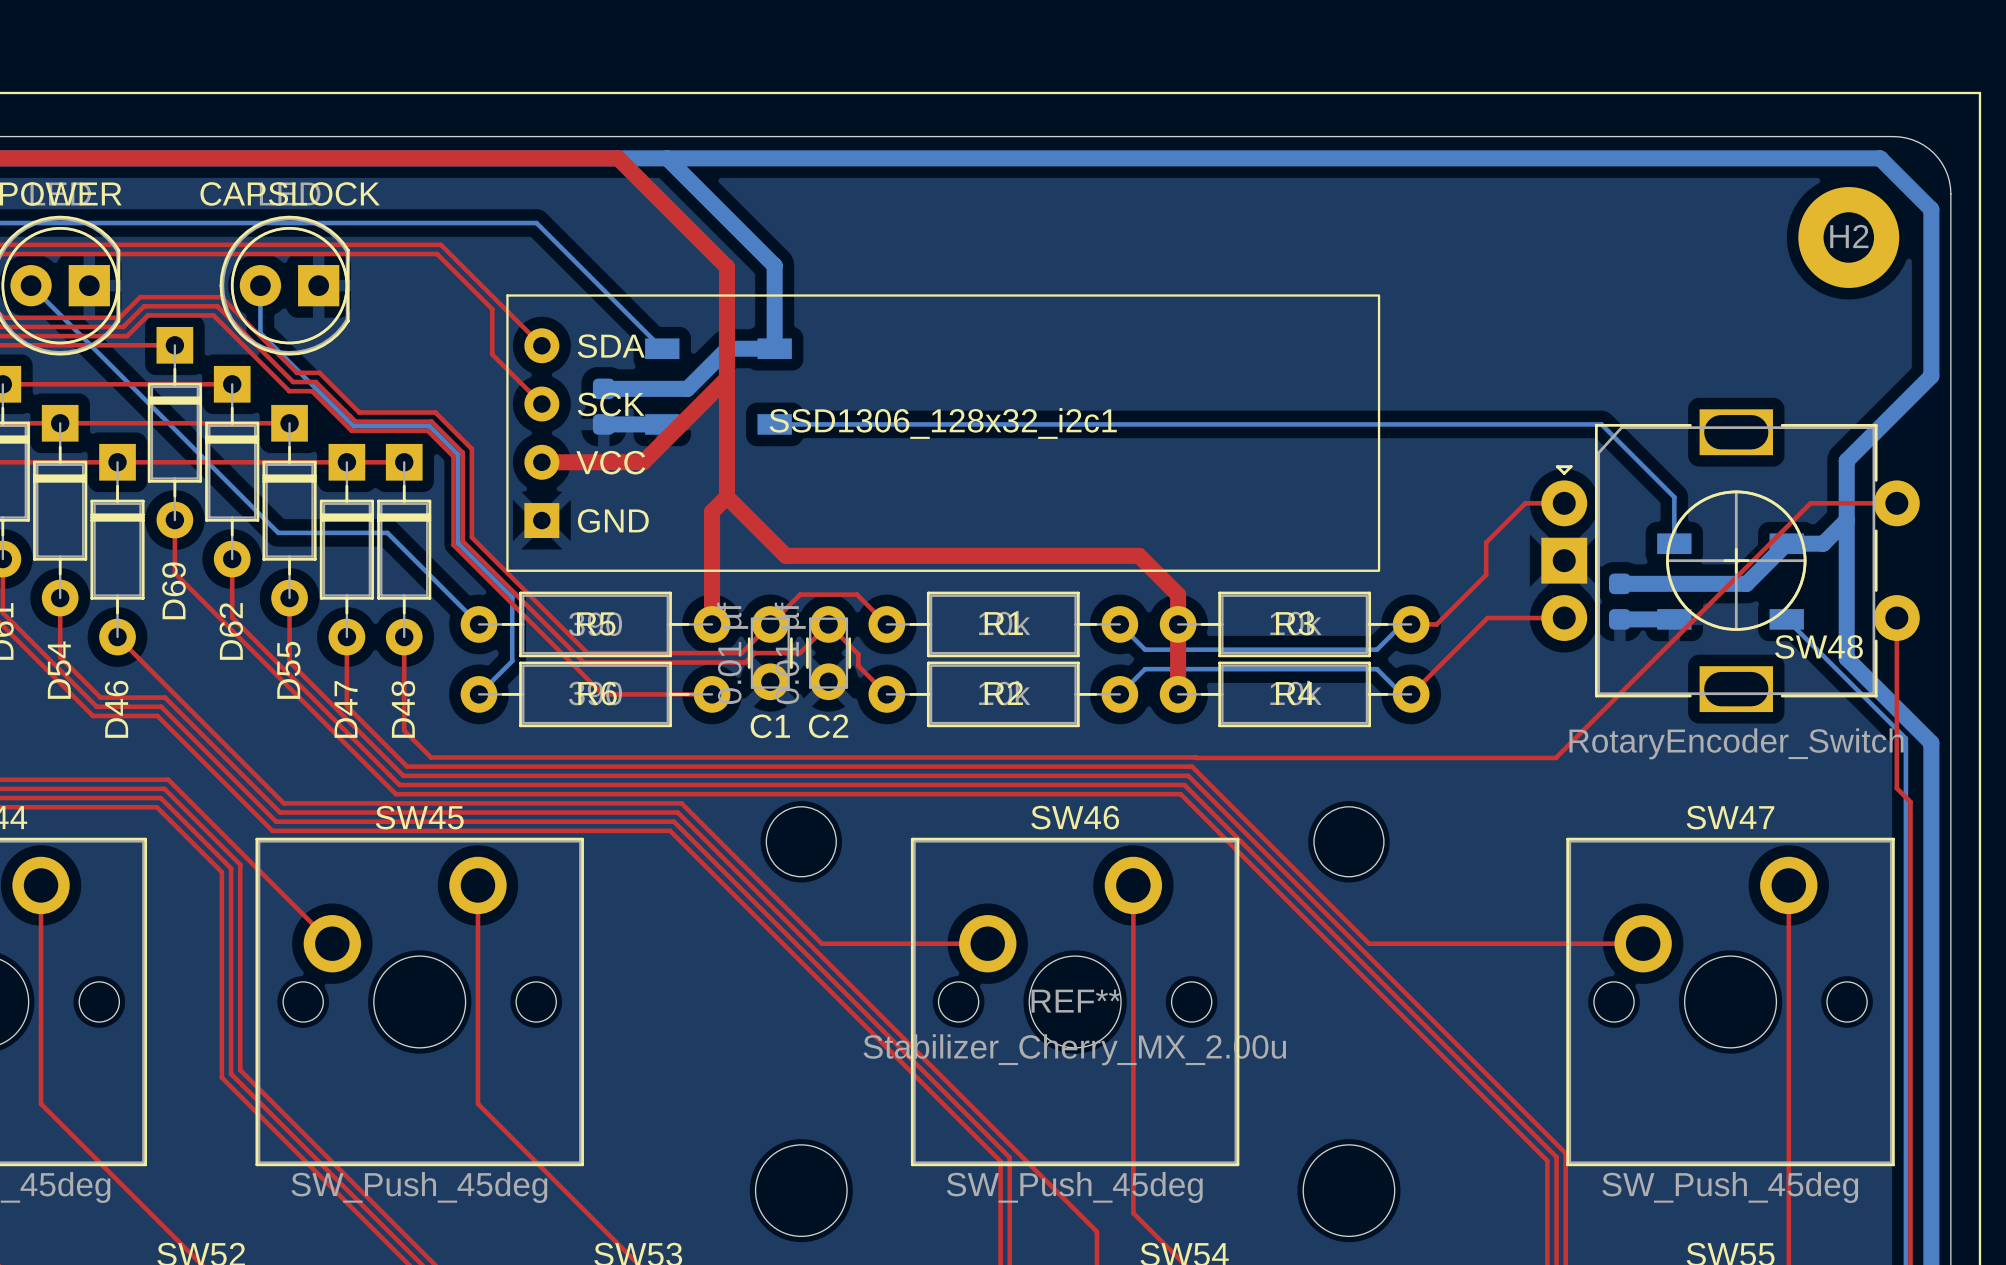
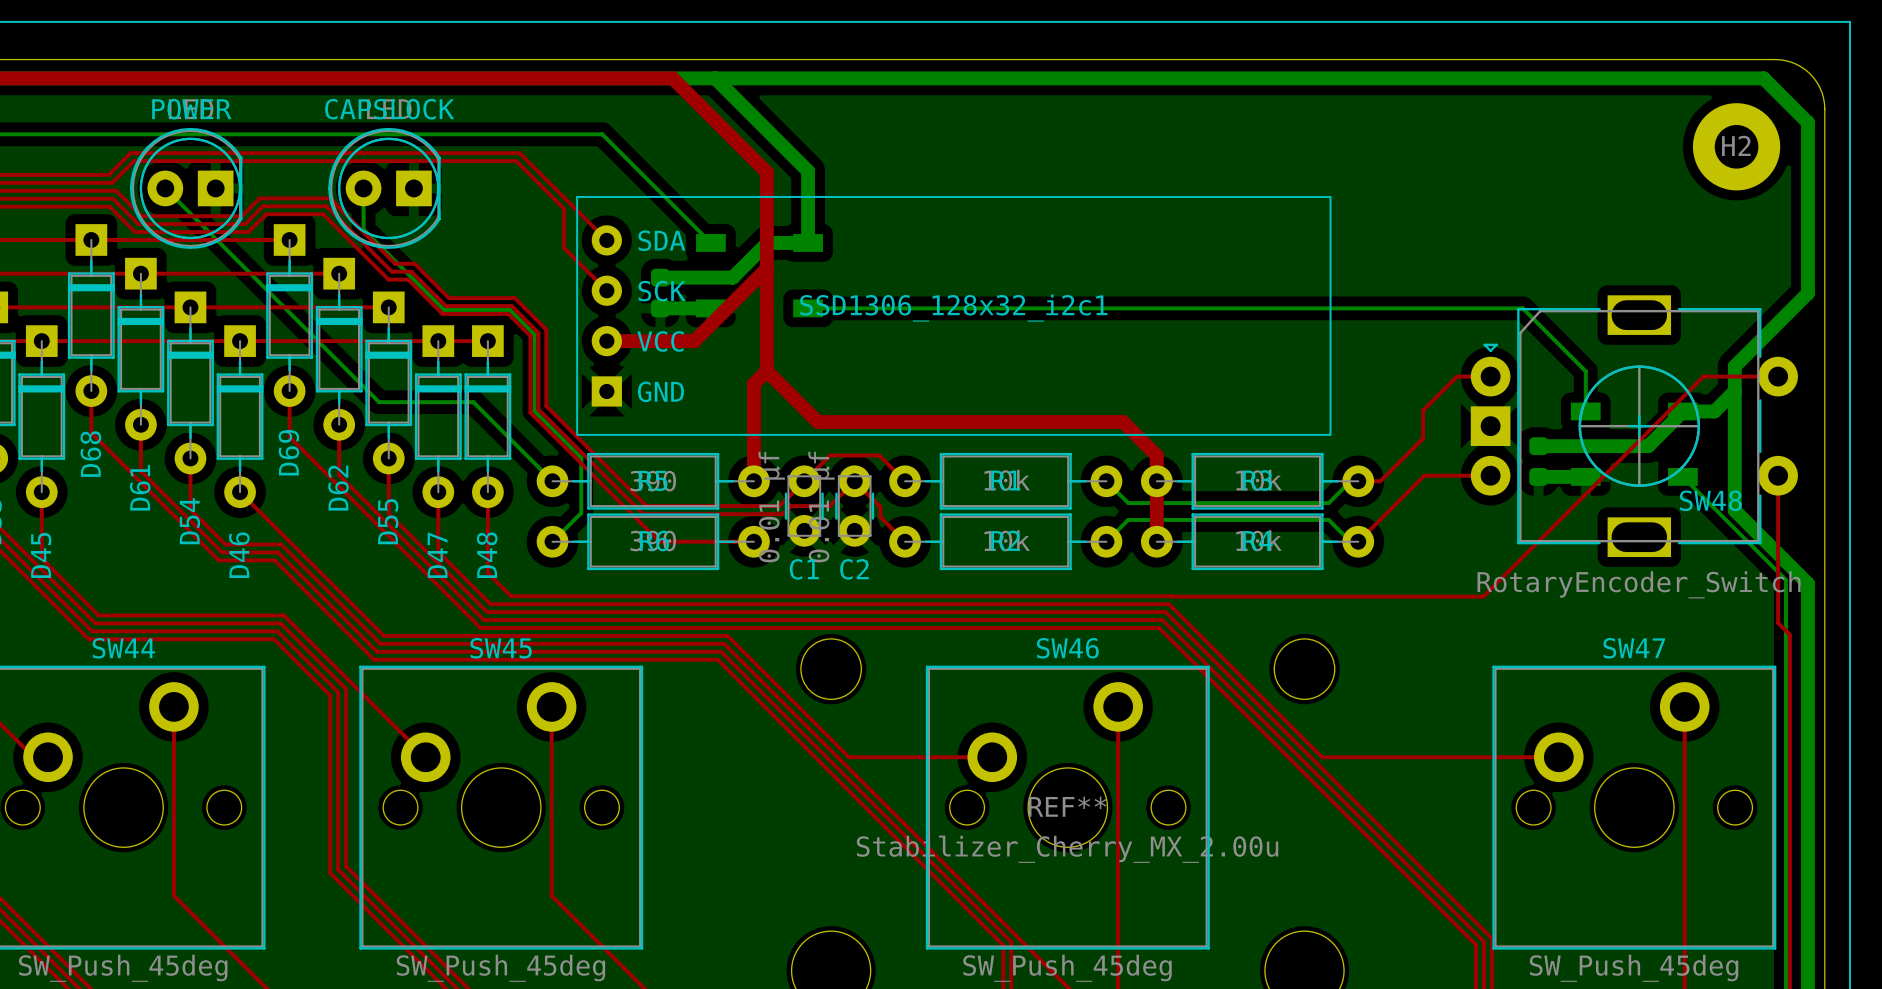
bottom track: (1931, 376) (1846, 460) (1846, 491) -> (1807, 266) (1807, 293) (1734, 366)

